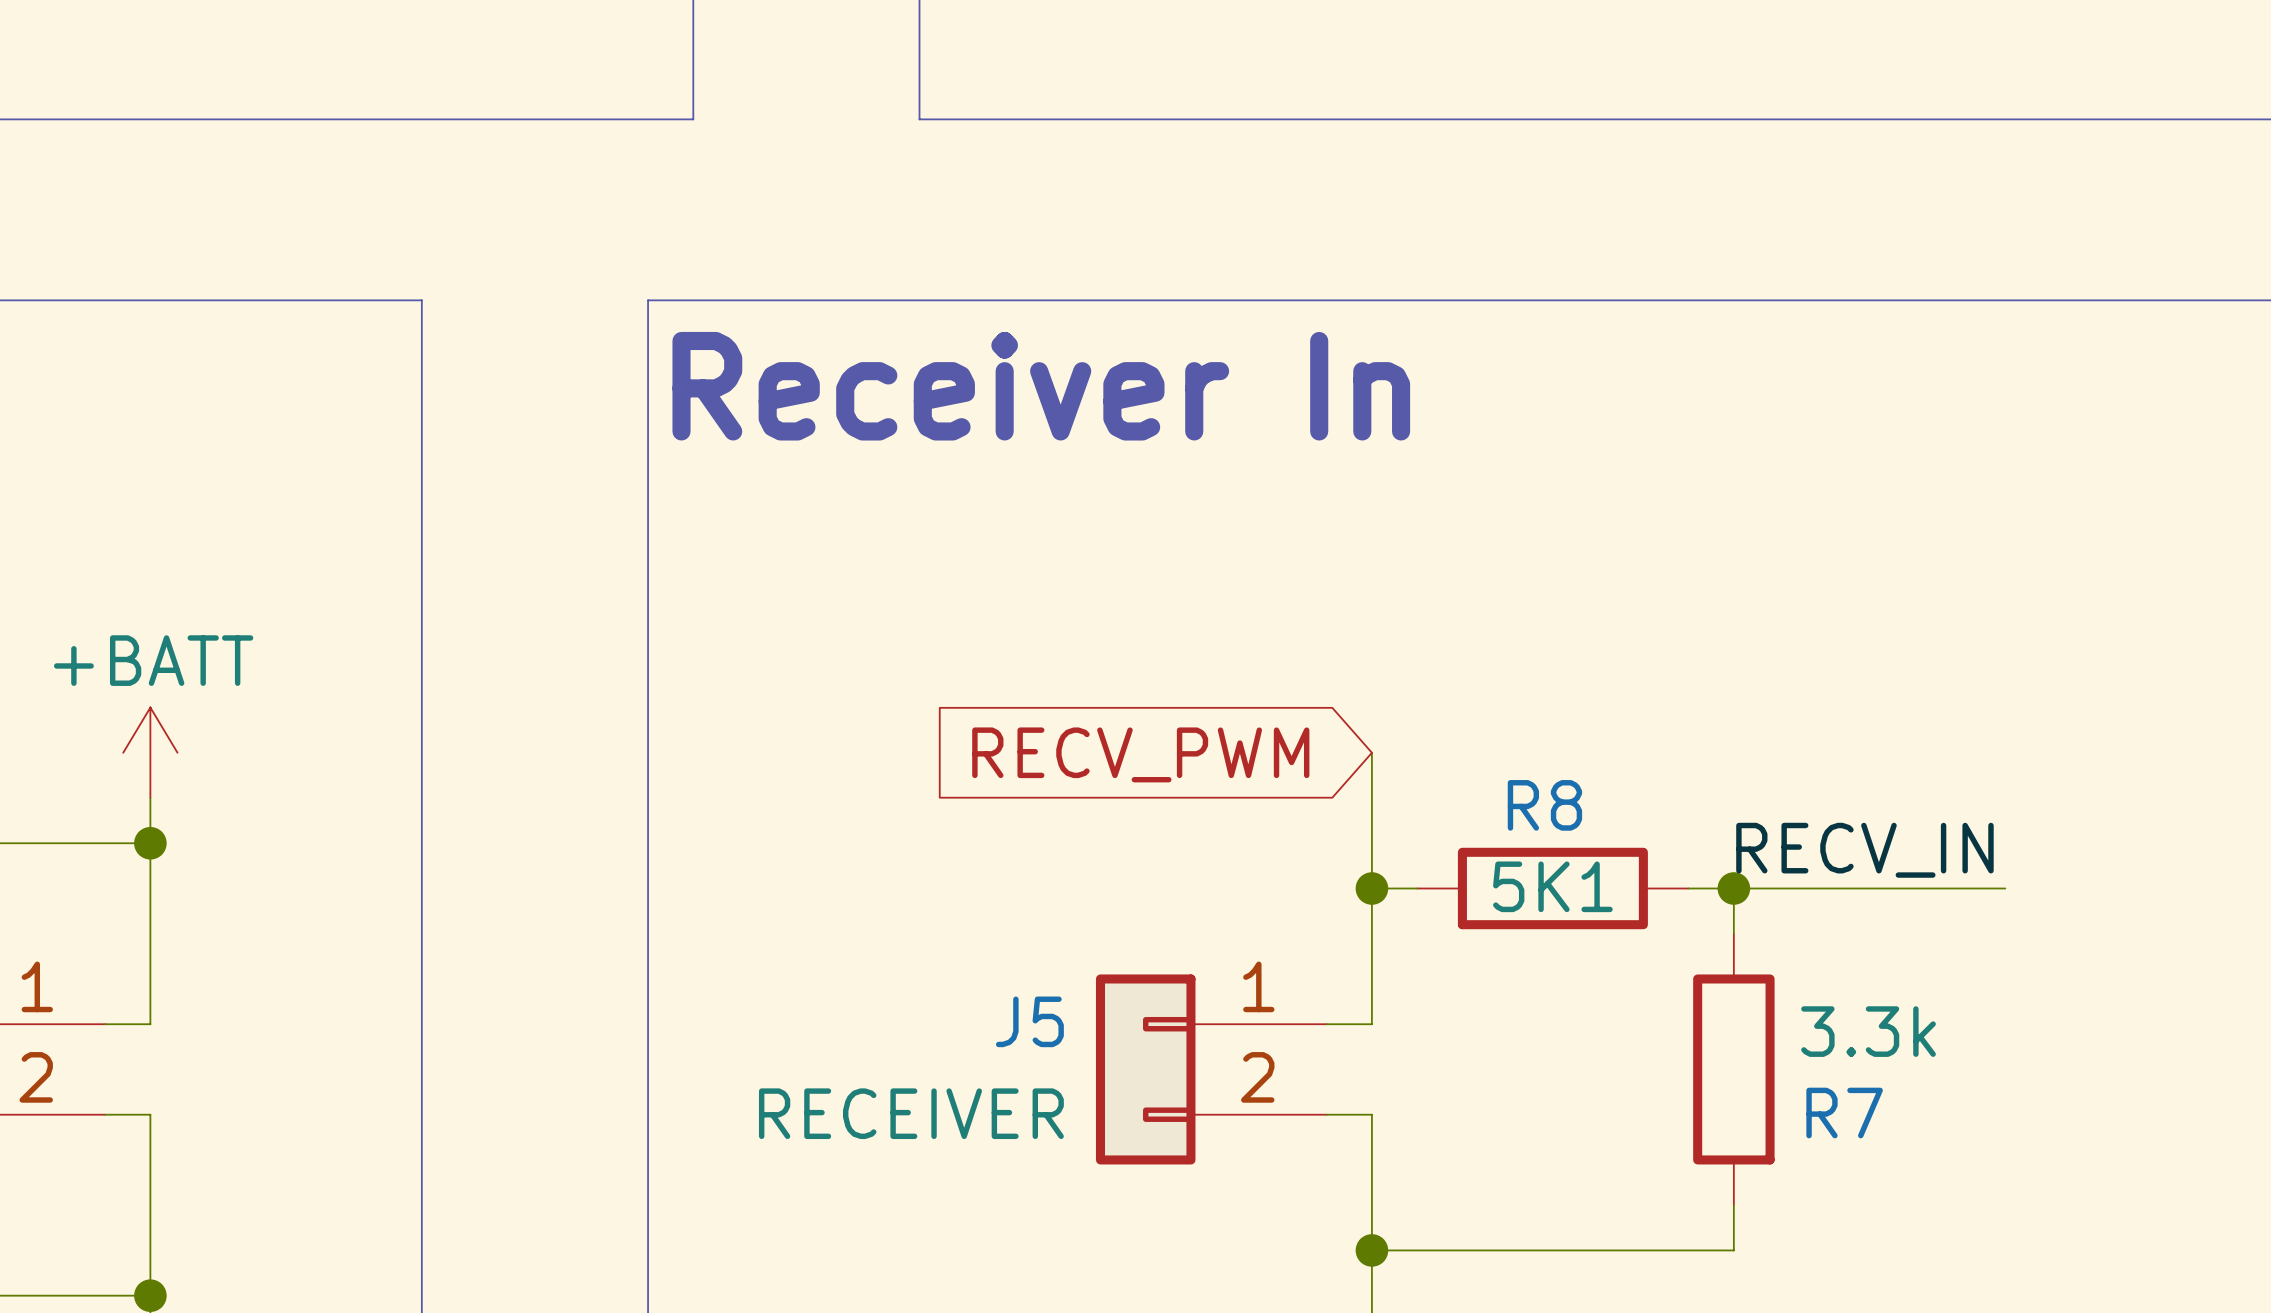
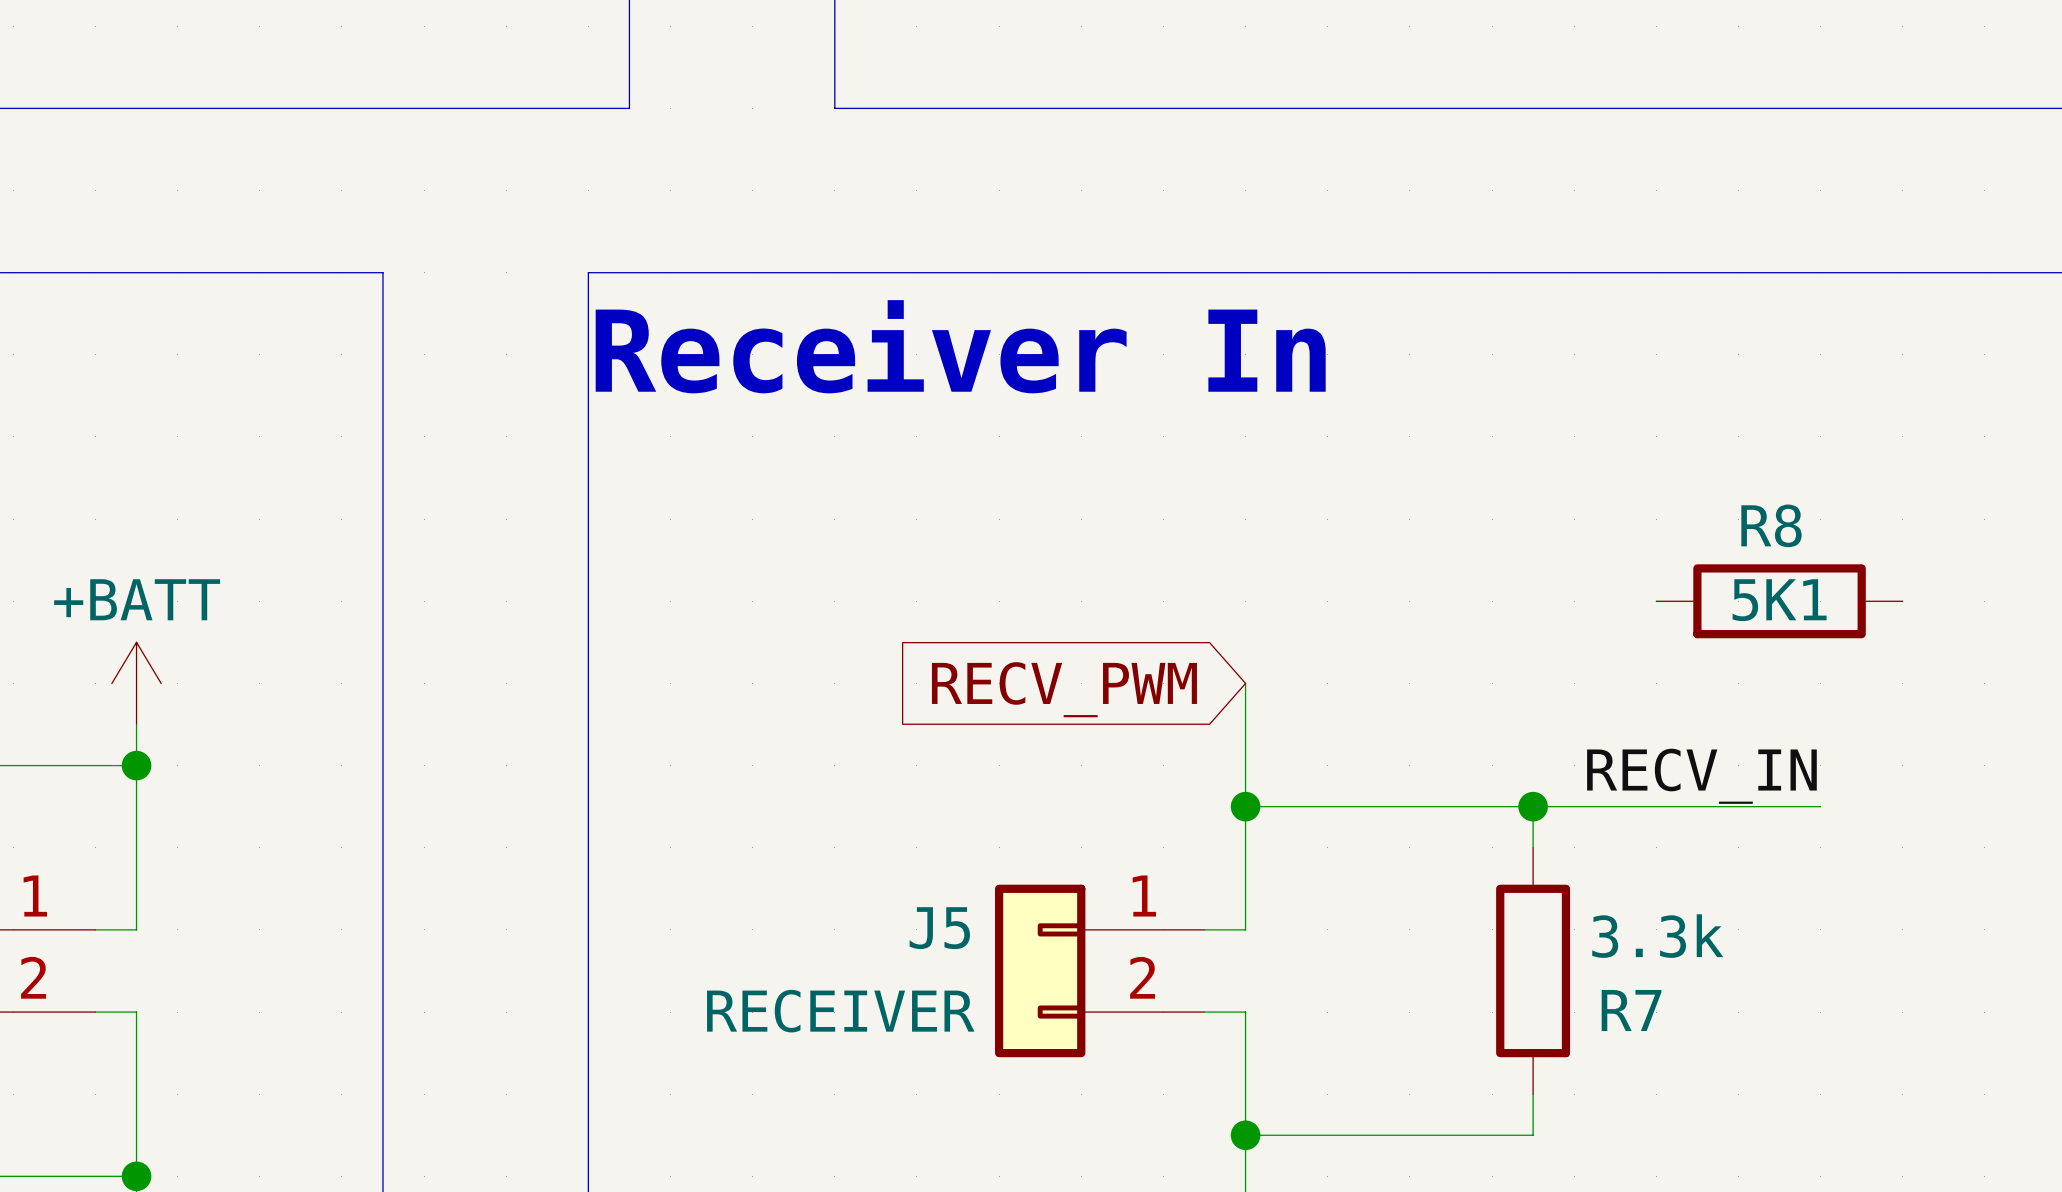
wire: none -> (1286, 806) (1533, 806) (1533, 847)
R8 position: (1552, 888) -> (1779, 601)
wire: (1733, 888) (1733, 933) -> none
junction position: (1733, 888) -> (1533, 806)
R7 position: (1733, 1069) -> (1533, 970)
wire: (1733, 1205) (1733, 1250) (1688, 1250) -> (1533, 1094) (1533, 1135)

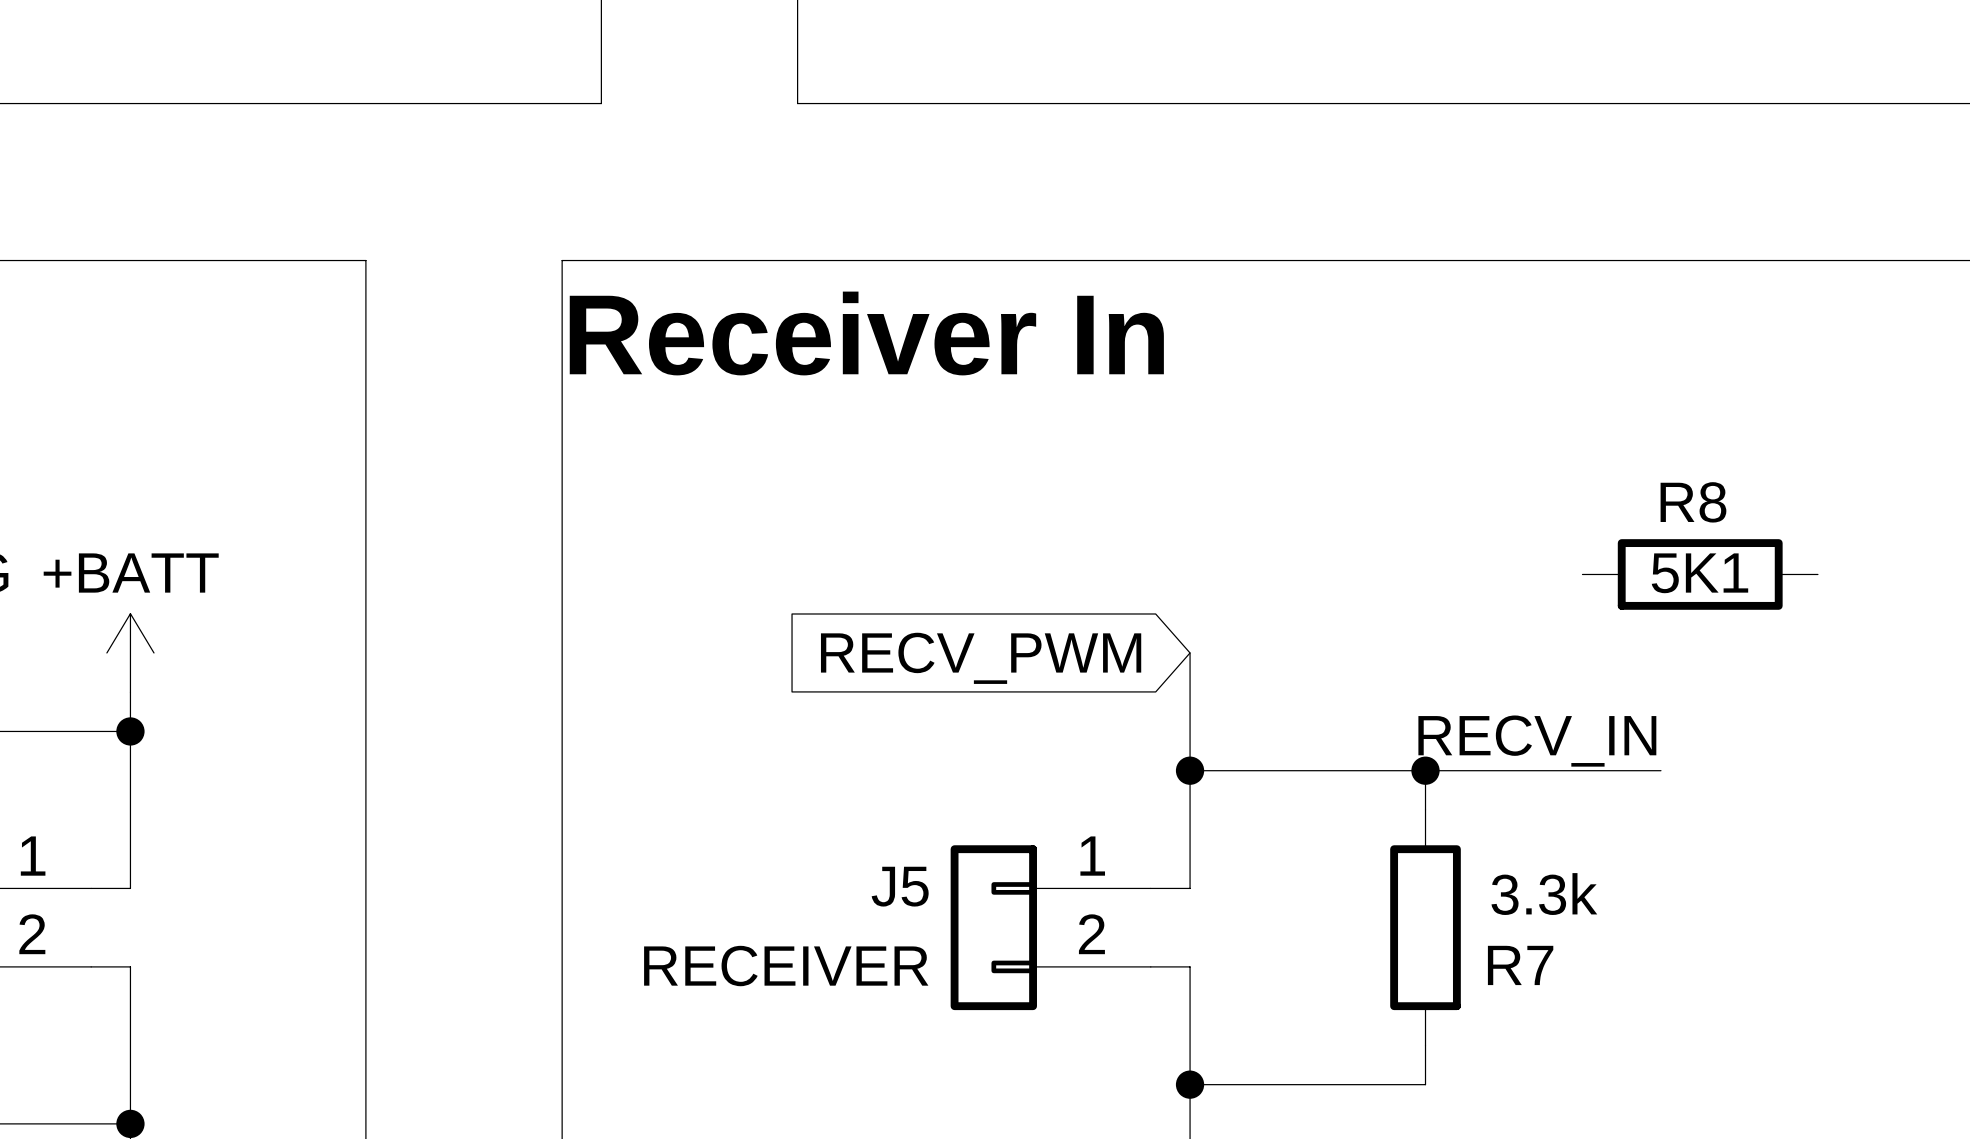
label position: RECV_IN (1701, 776) -> RECV_IN (1537, 741)
wire: (1533, 806) (1533, 847) -> (1425, 770) (1425, 809)
junction position: (1533, 806) -> (1425, 770)
wire: (1738, 806) (1820, 806) -> none
R7 position: (1533, 970) -> (1425, 927)
wire: (1533, 1094) (1533, 1135) (1492, 1135) -> (1425, 1045) (1425, 1084)

